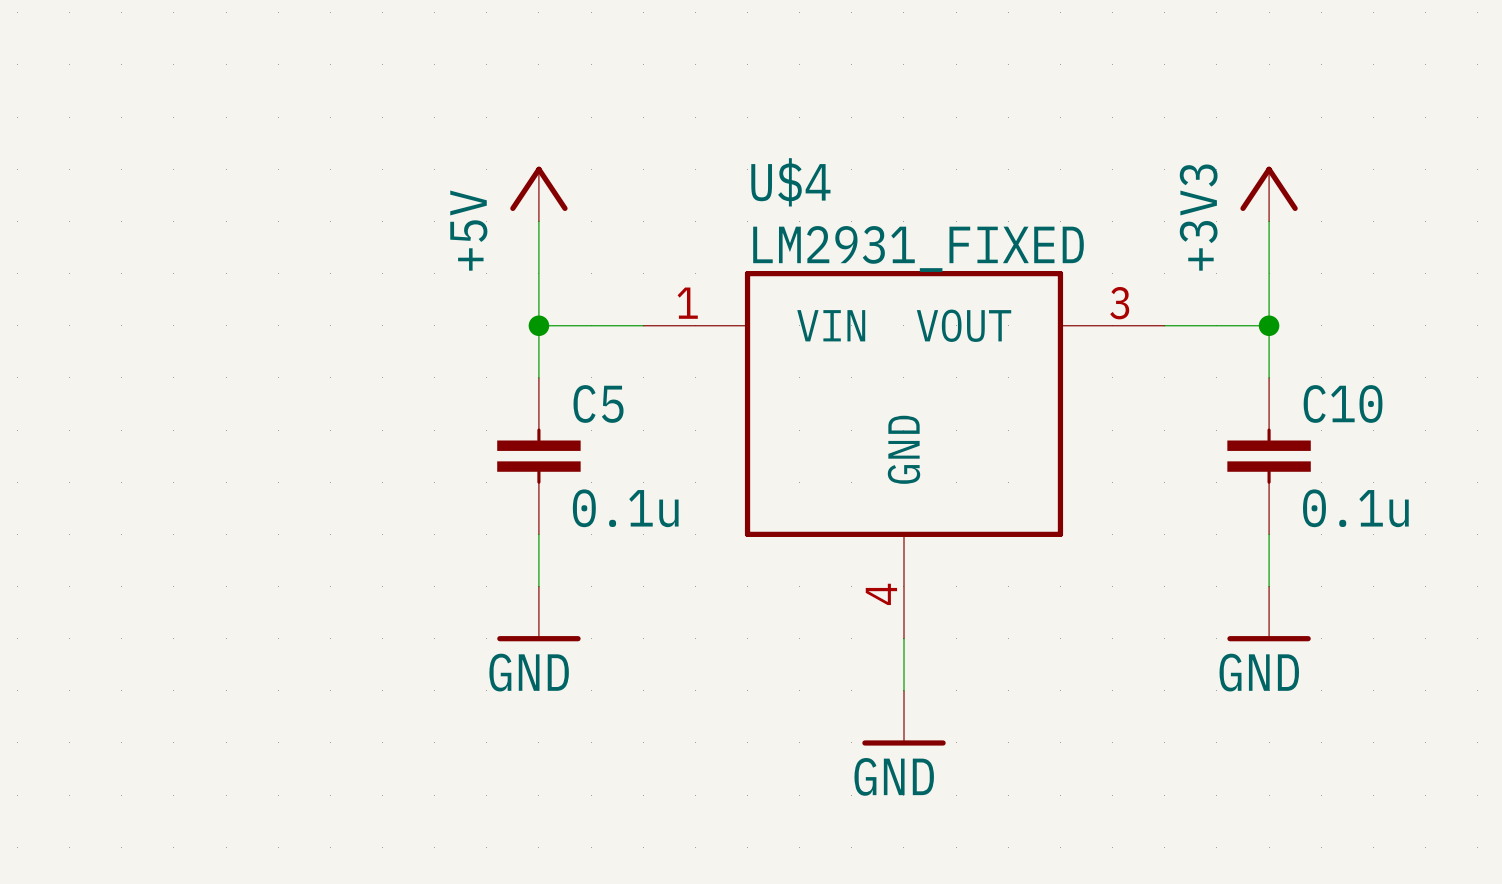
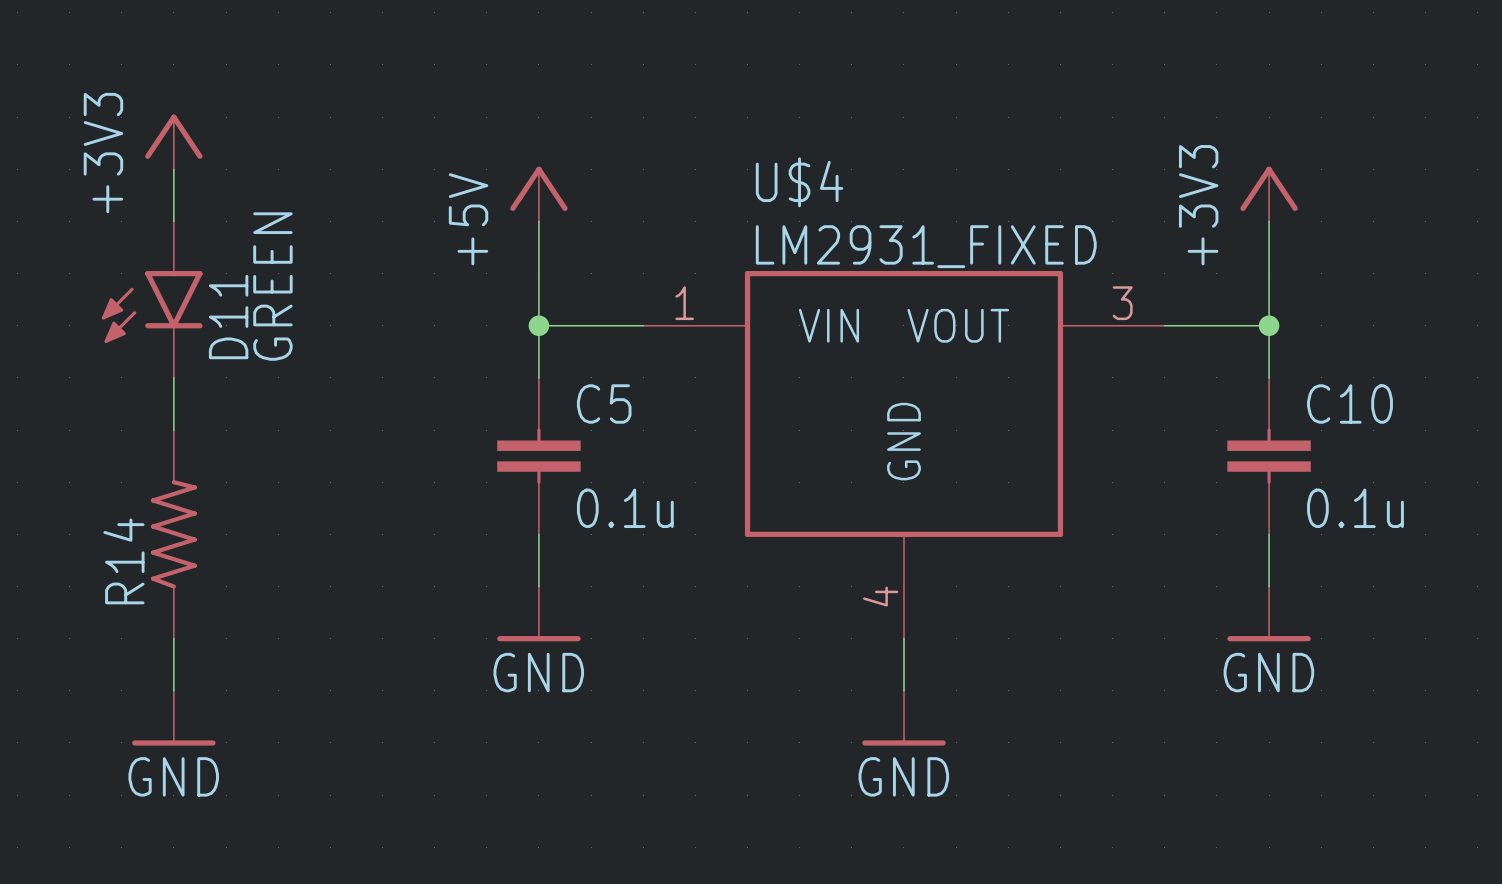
power symbol: none -> +3V3 (173, 141)
wire: none -> (173, 169) (173, 221)
D11: none -> GREEN (152, 299)
wire: none -> (173, 377) (173, 430)
R14: none -> (173, 534)
wire: none -> (173, 638) (173, 690)
power symbol: none -> GND (173, 718)

